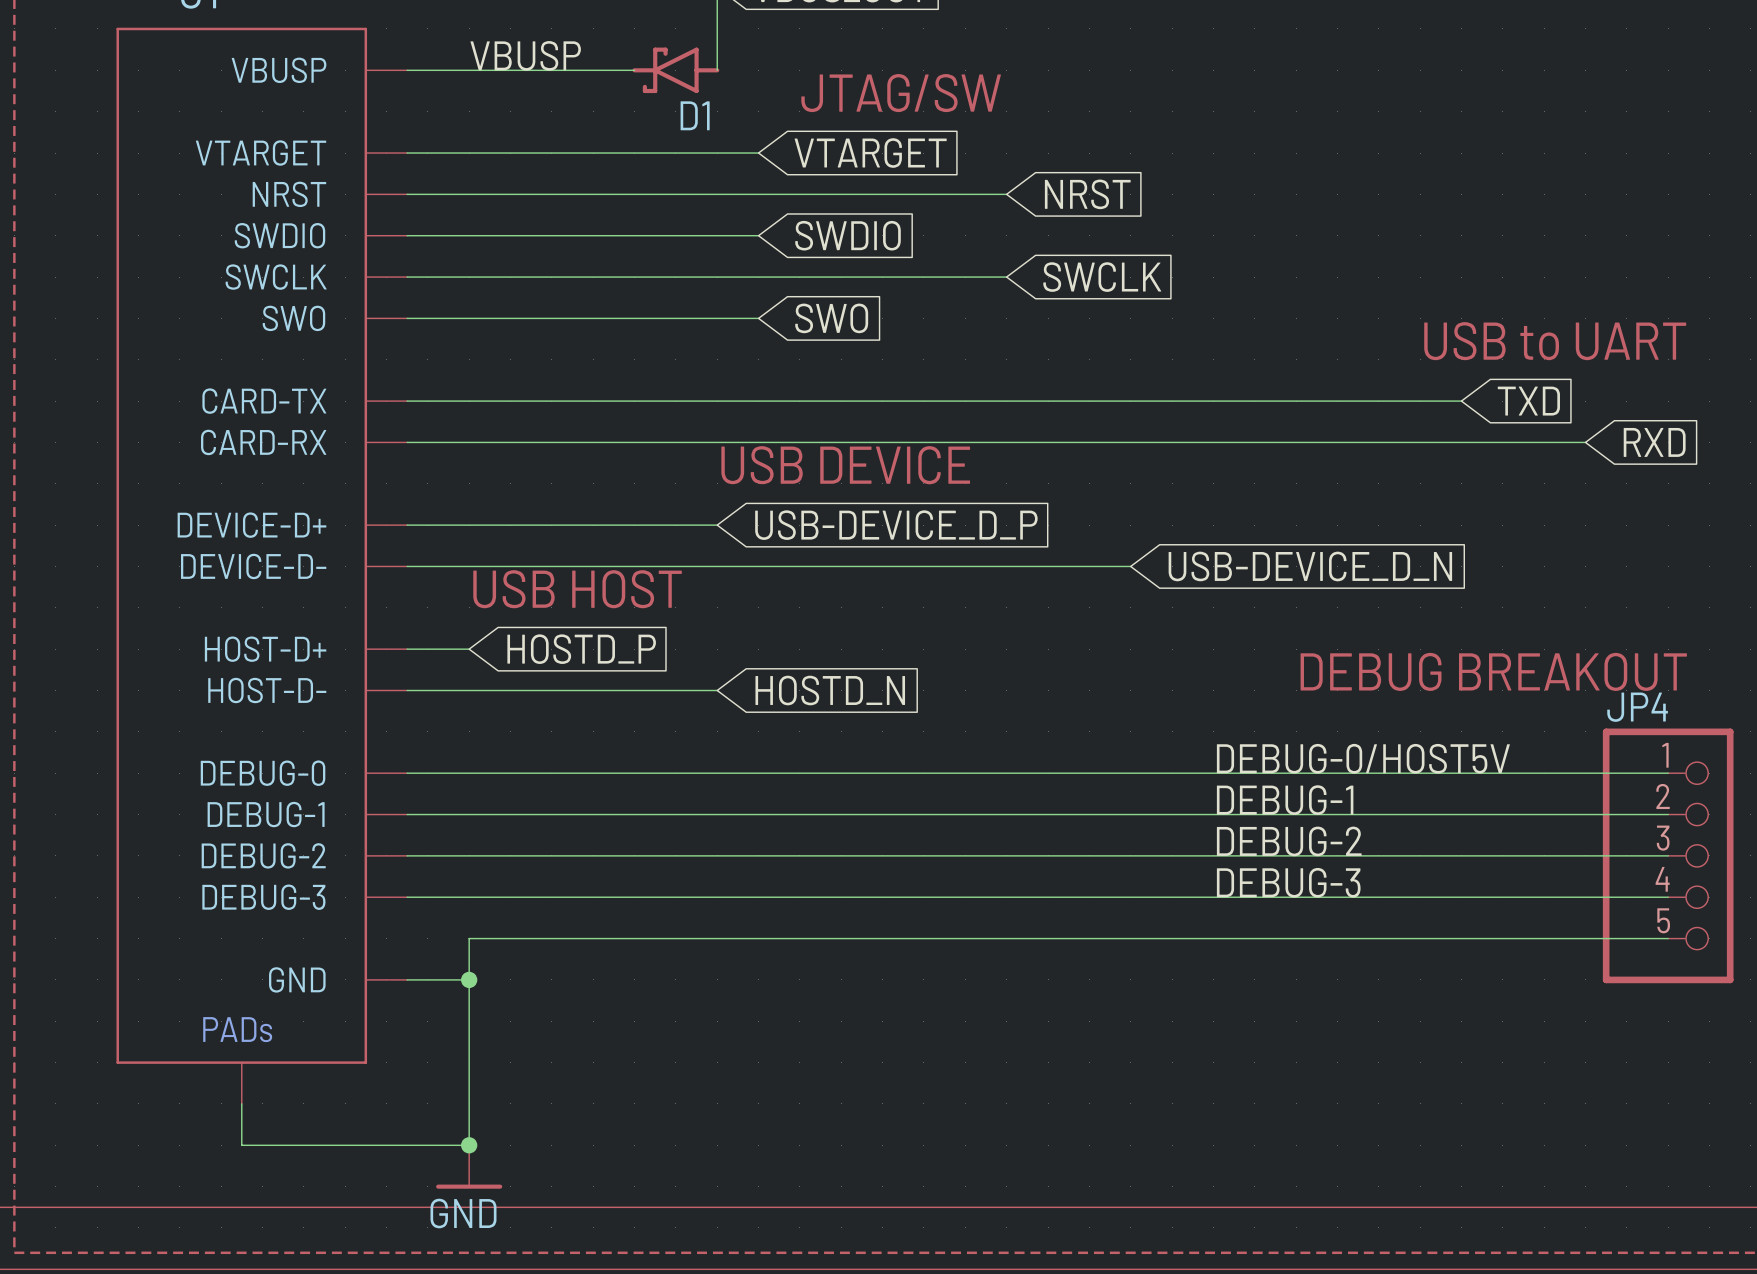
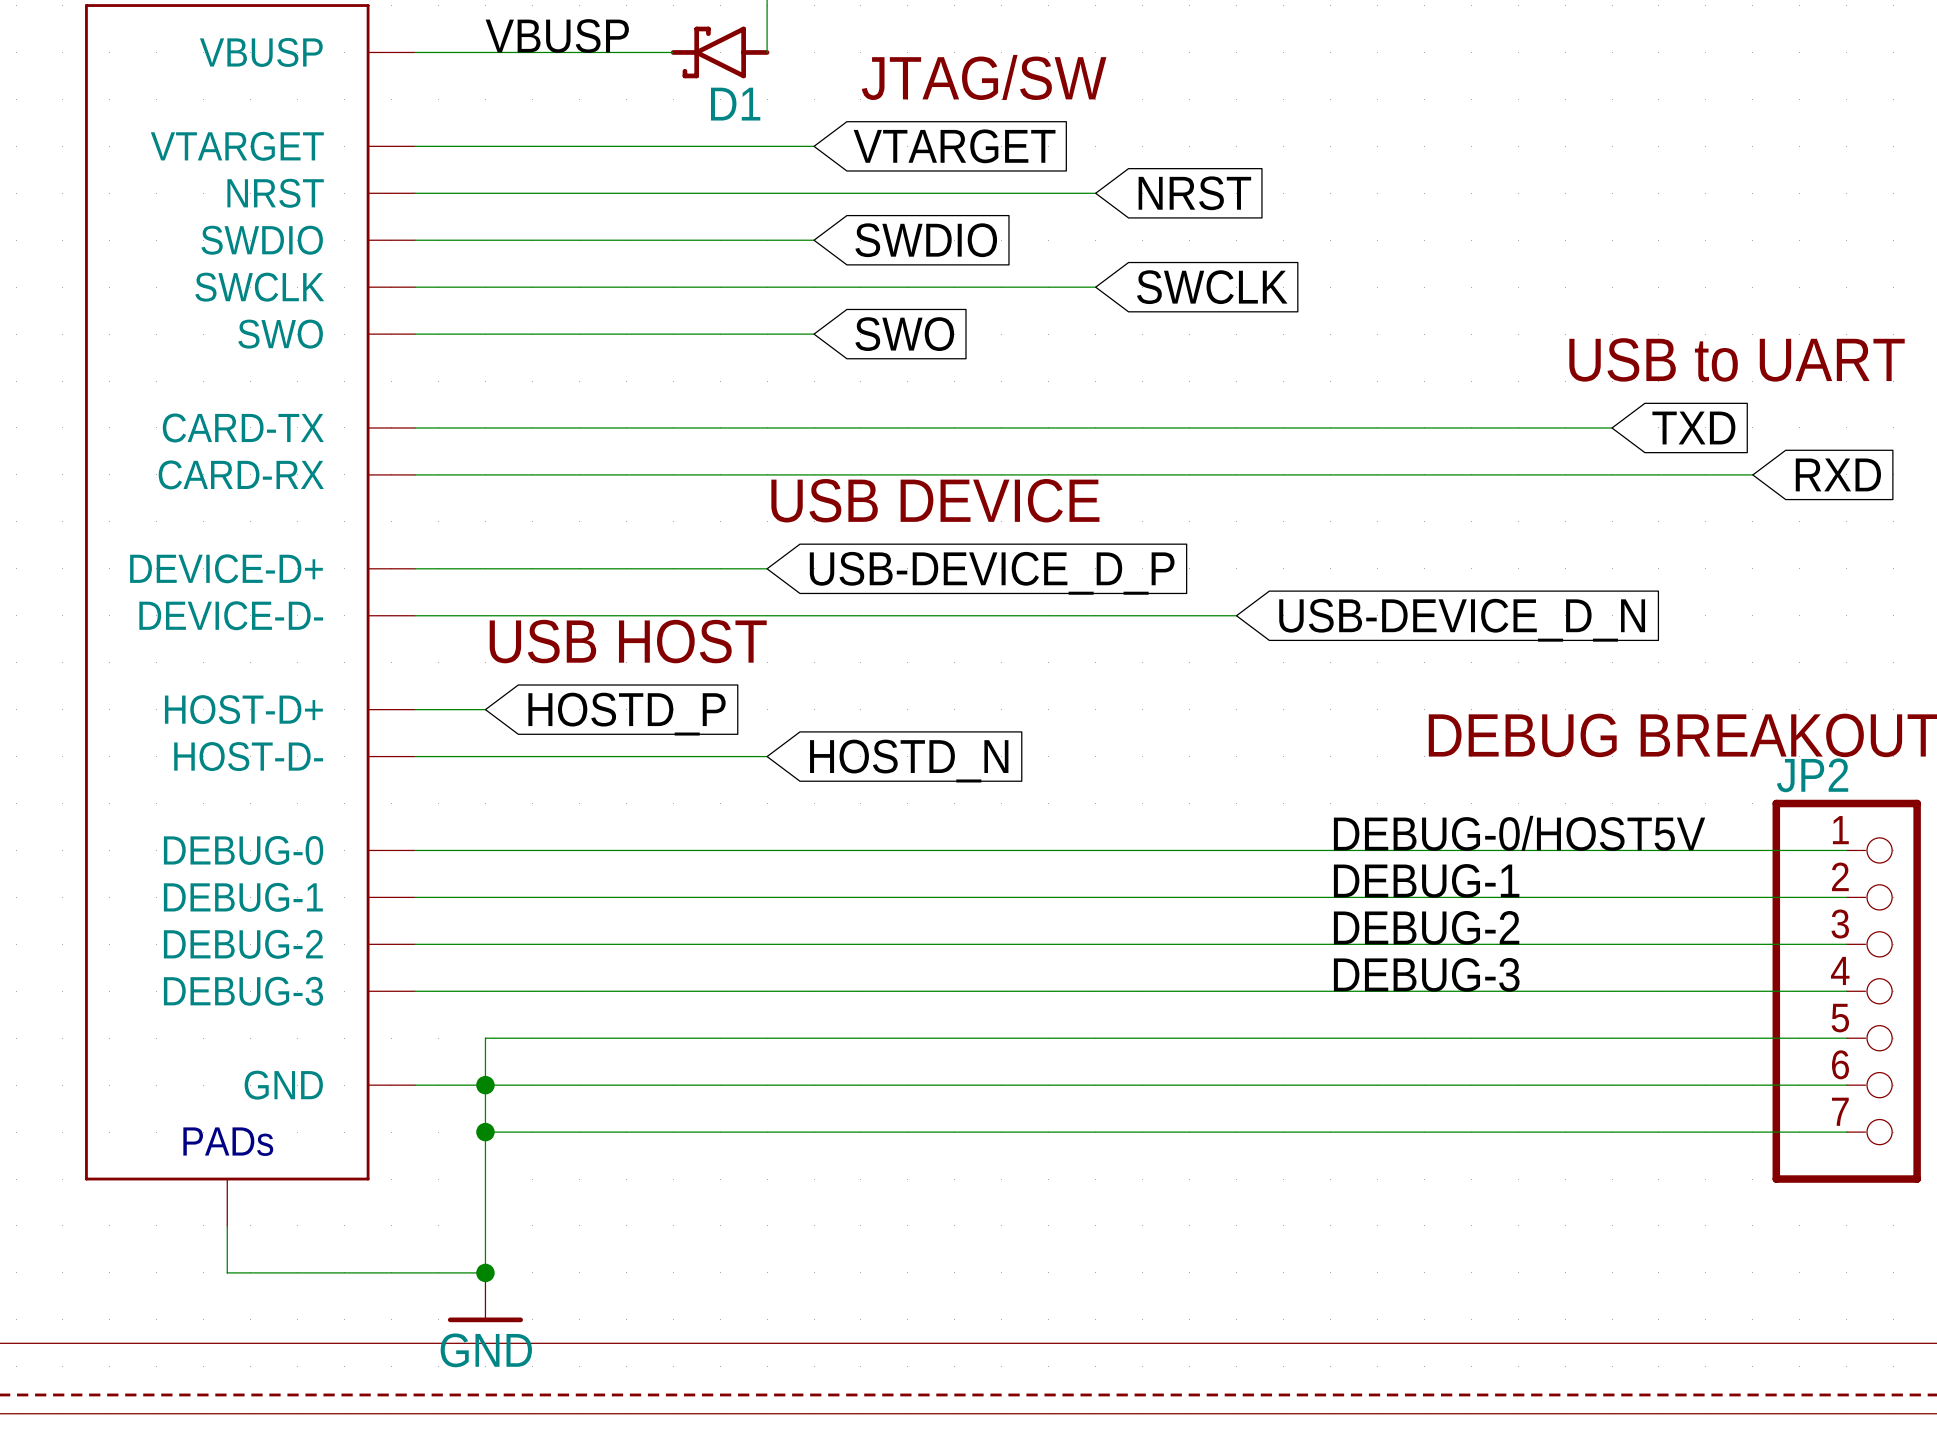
JP4: (1668, 855) -> none
JP2: none -> (1846, 991)
wire: none -> (485, 1085) (1846, 1085)
wire: none -> (485, 1132) (1846, 1132)
junction: none -> (485, 1132)

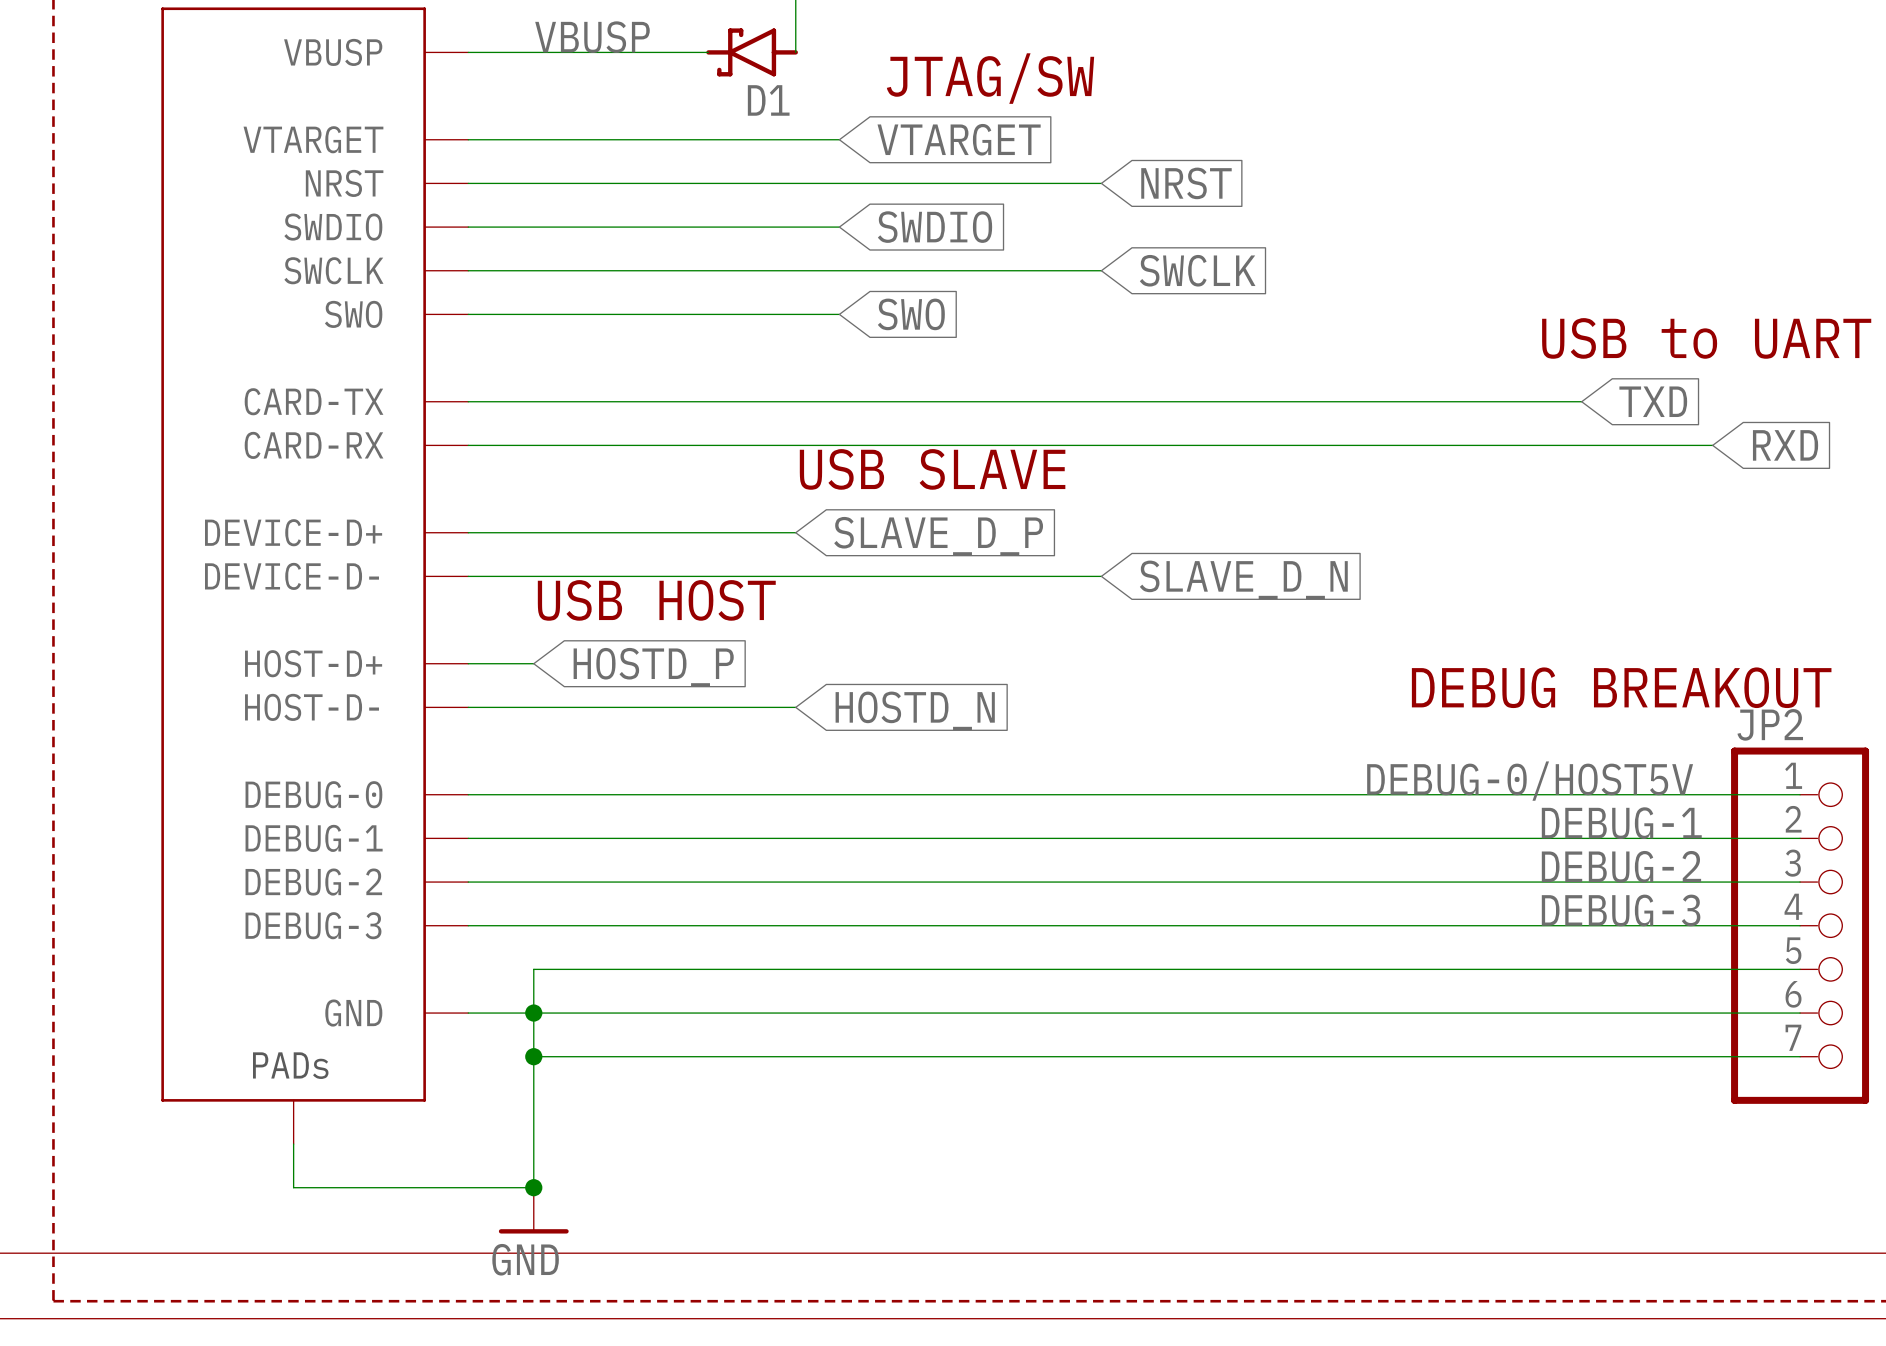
text: USB DEVICE (935, 500) -> USB SLAVE (932, 469)
global label: USB-DEVICE_D_P (992, 573) -> SLAVE_D_P (938, 536)
wire: (1095, 615) (1236, 615) -> none
global label: USB-DEVICE_D_N (1462, 620) -> SLAVE_D_N (1243, 579)
label position: DEBUG-0/HOST5V (1519, 833) -> DEBUG-0/HOST5V (1530, 781)
label position: DEBUG-1 (1426, 880) -> DEBUG-1 (1621, 823)
label position: DEBUG-2 (1426, 927) -> DEBUG-2 (1621, 866)
label position: DEBUG-3 (1426, 974) -> DEBUG-3 (1621, 910)

